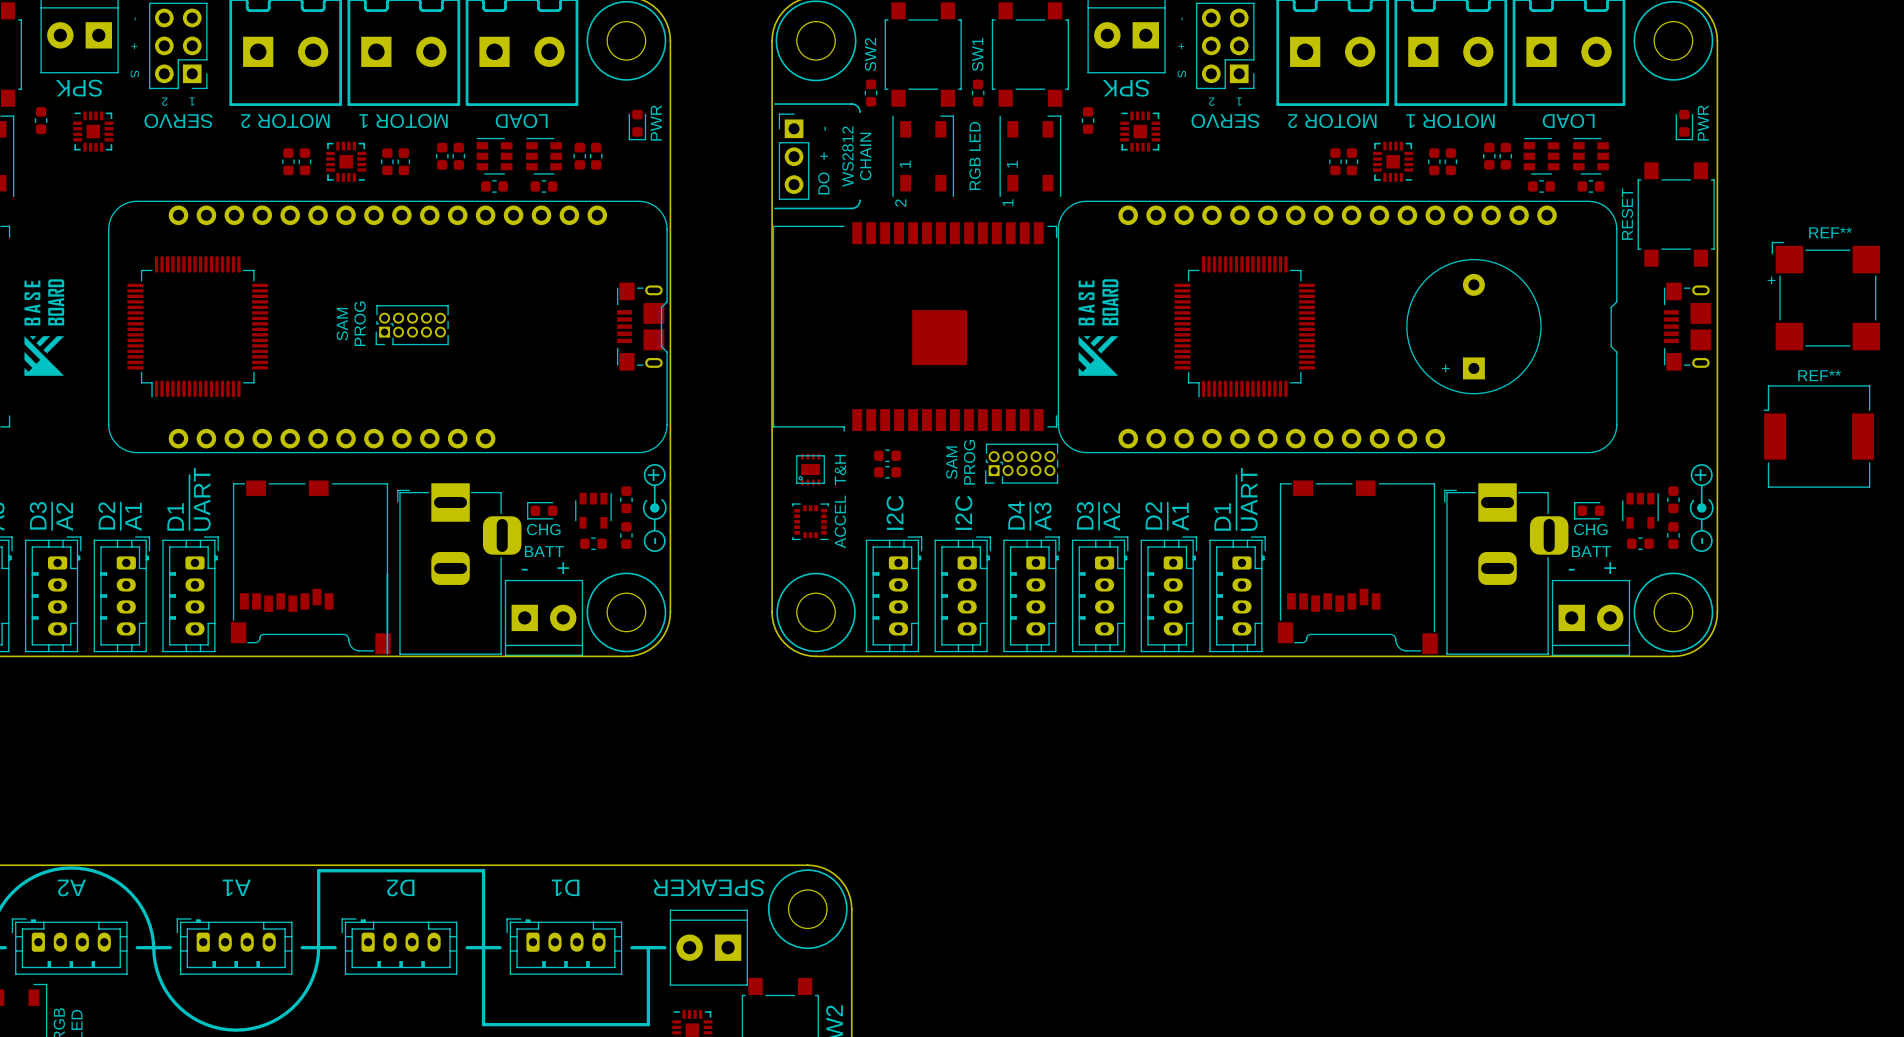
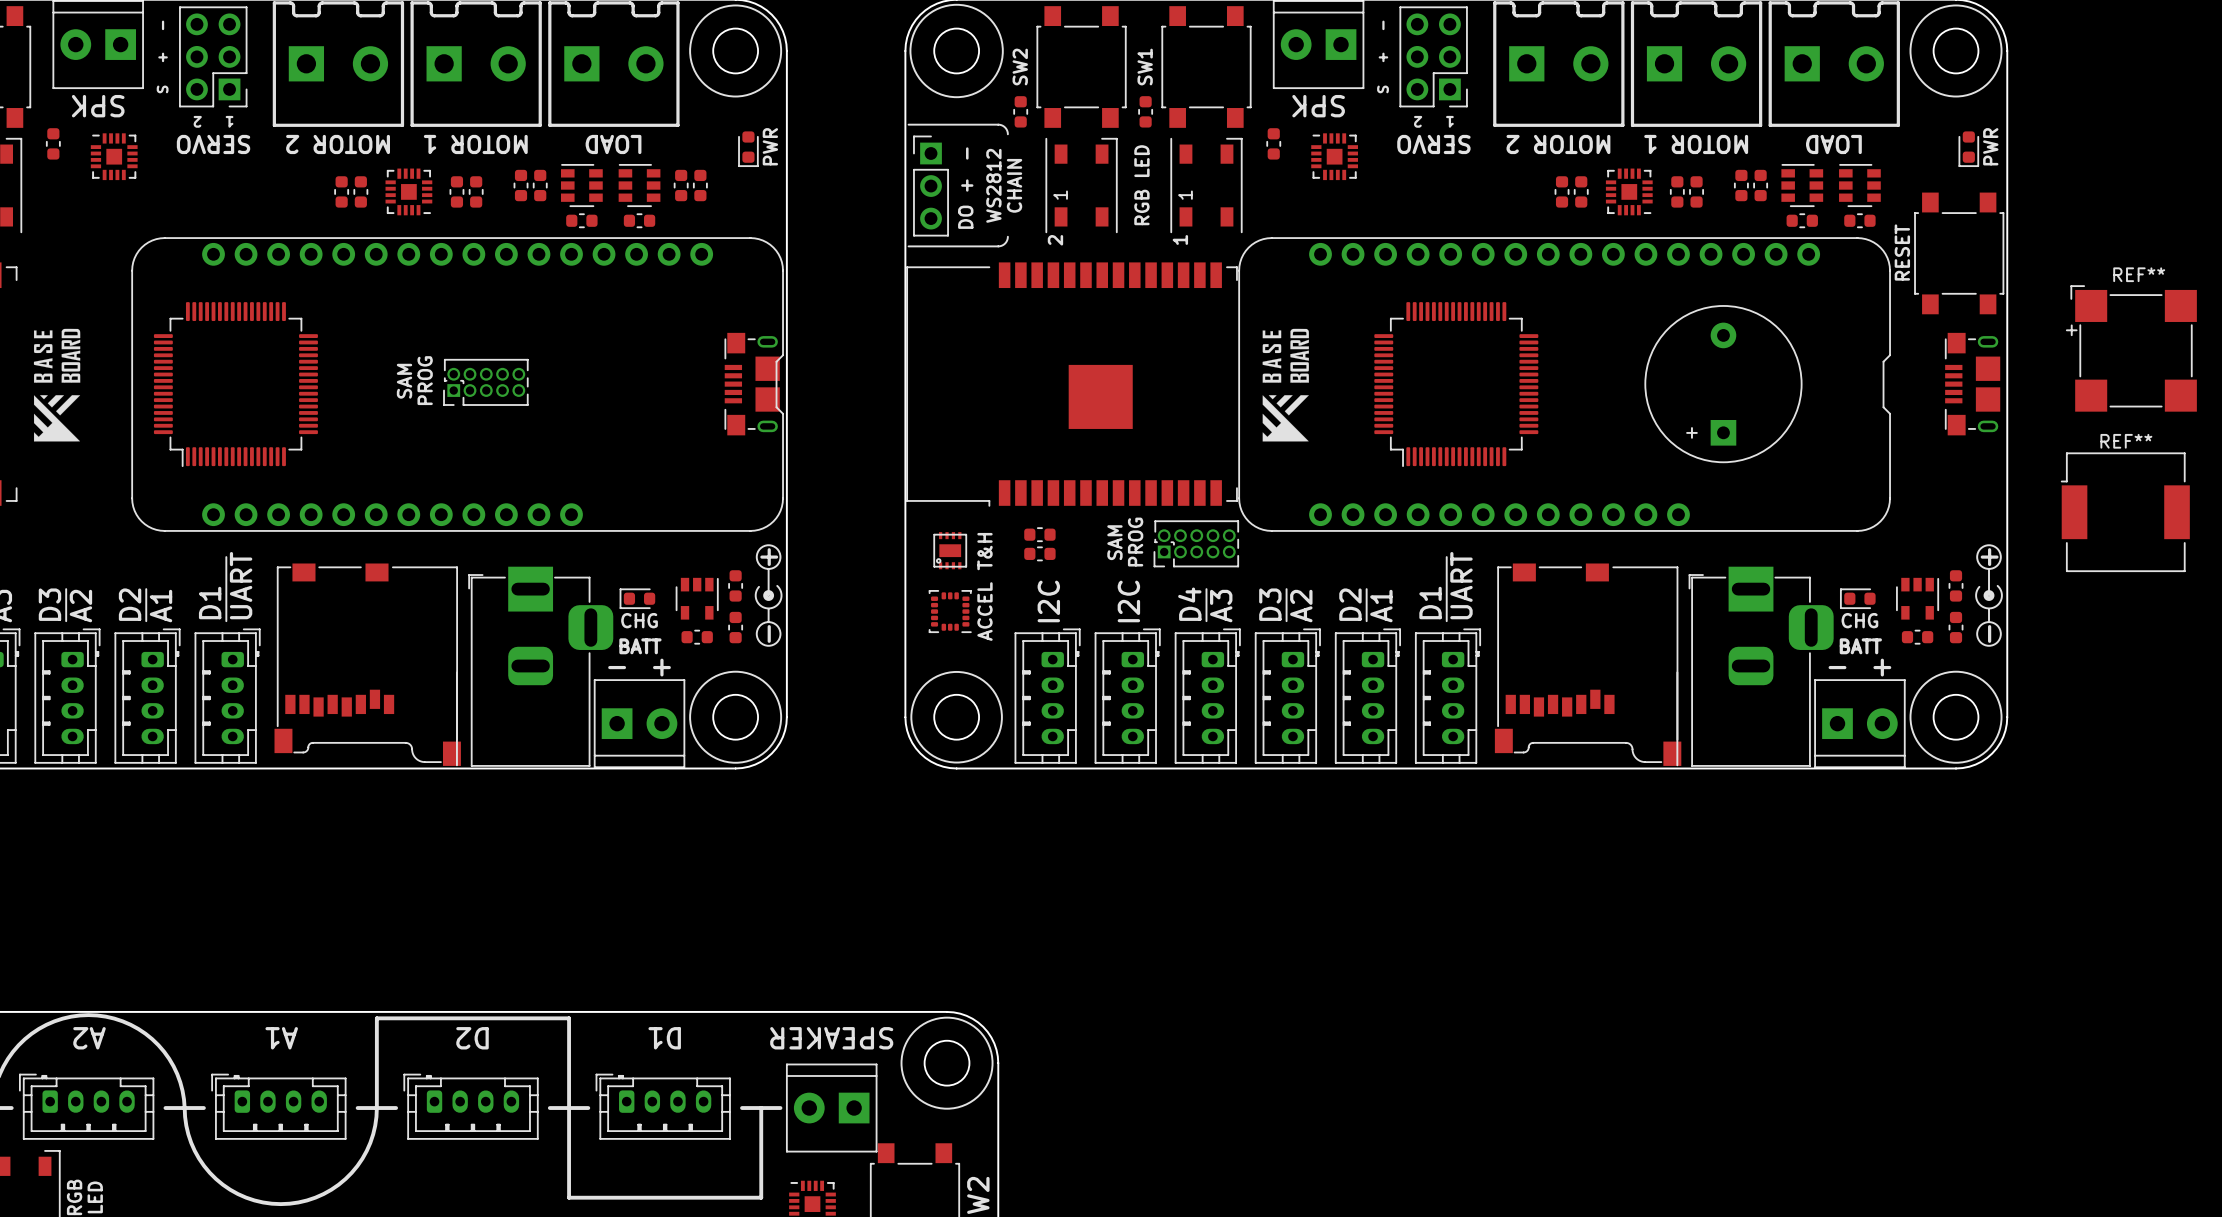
line: none -> (1677, 672) (1677, 765)

